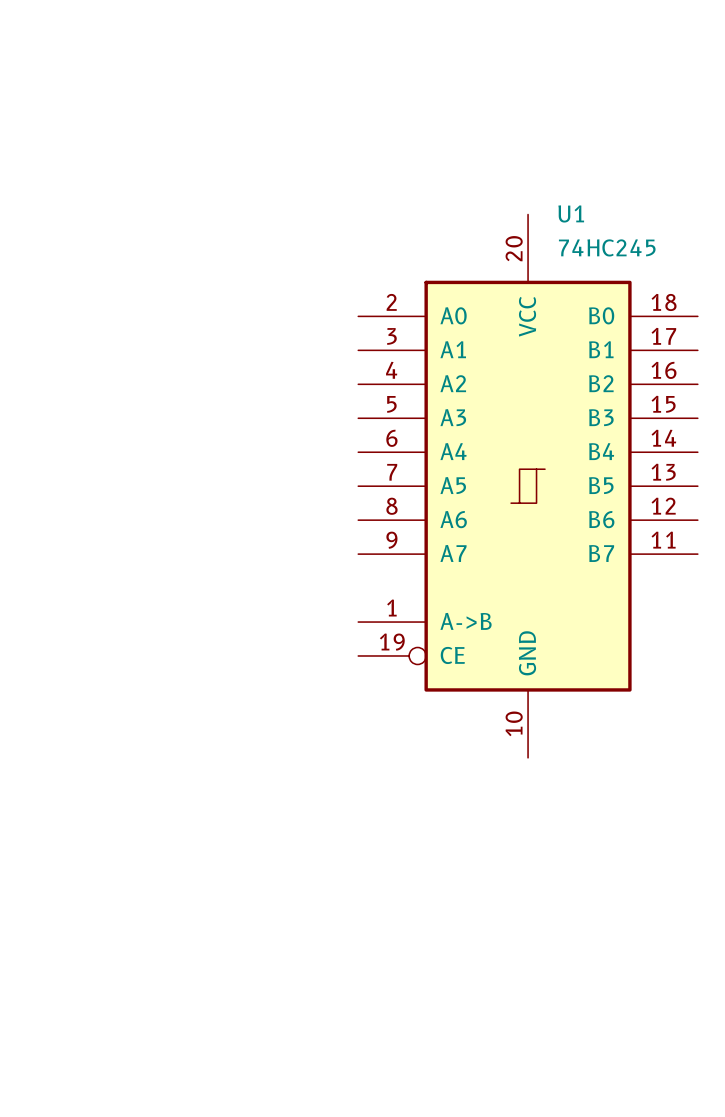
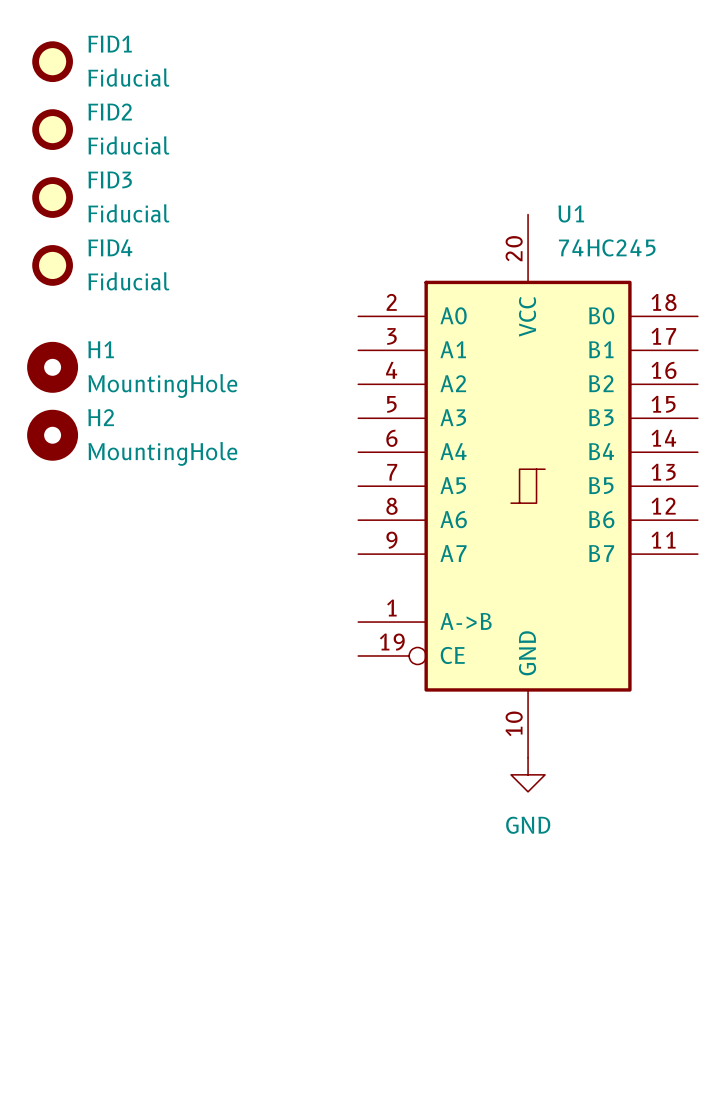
FID1: none -> Fiducial (52, 61)
FID2: none -> Fiducial (52, 129)
FID3: none -> Fiducial (52, 197)
FID4: none -> Fiducial (52, 265)
H1: none -> MountingHole (52, 367)
H2: none -> MountingHole (52, 435)
power symbol: none -> GND (528, 774)

